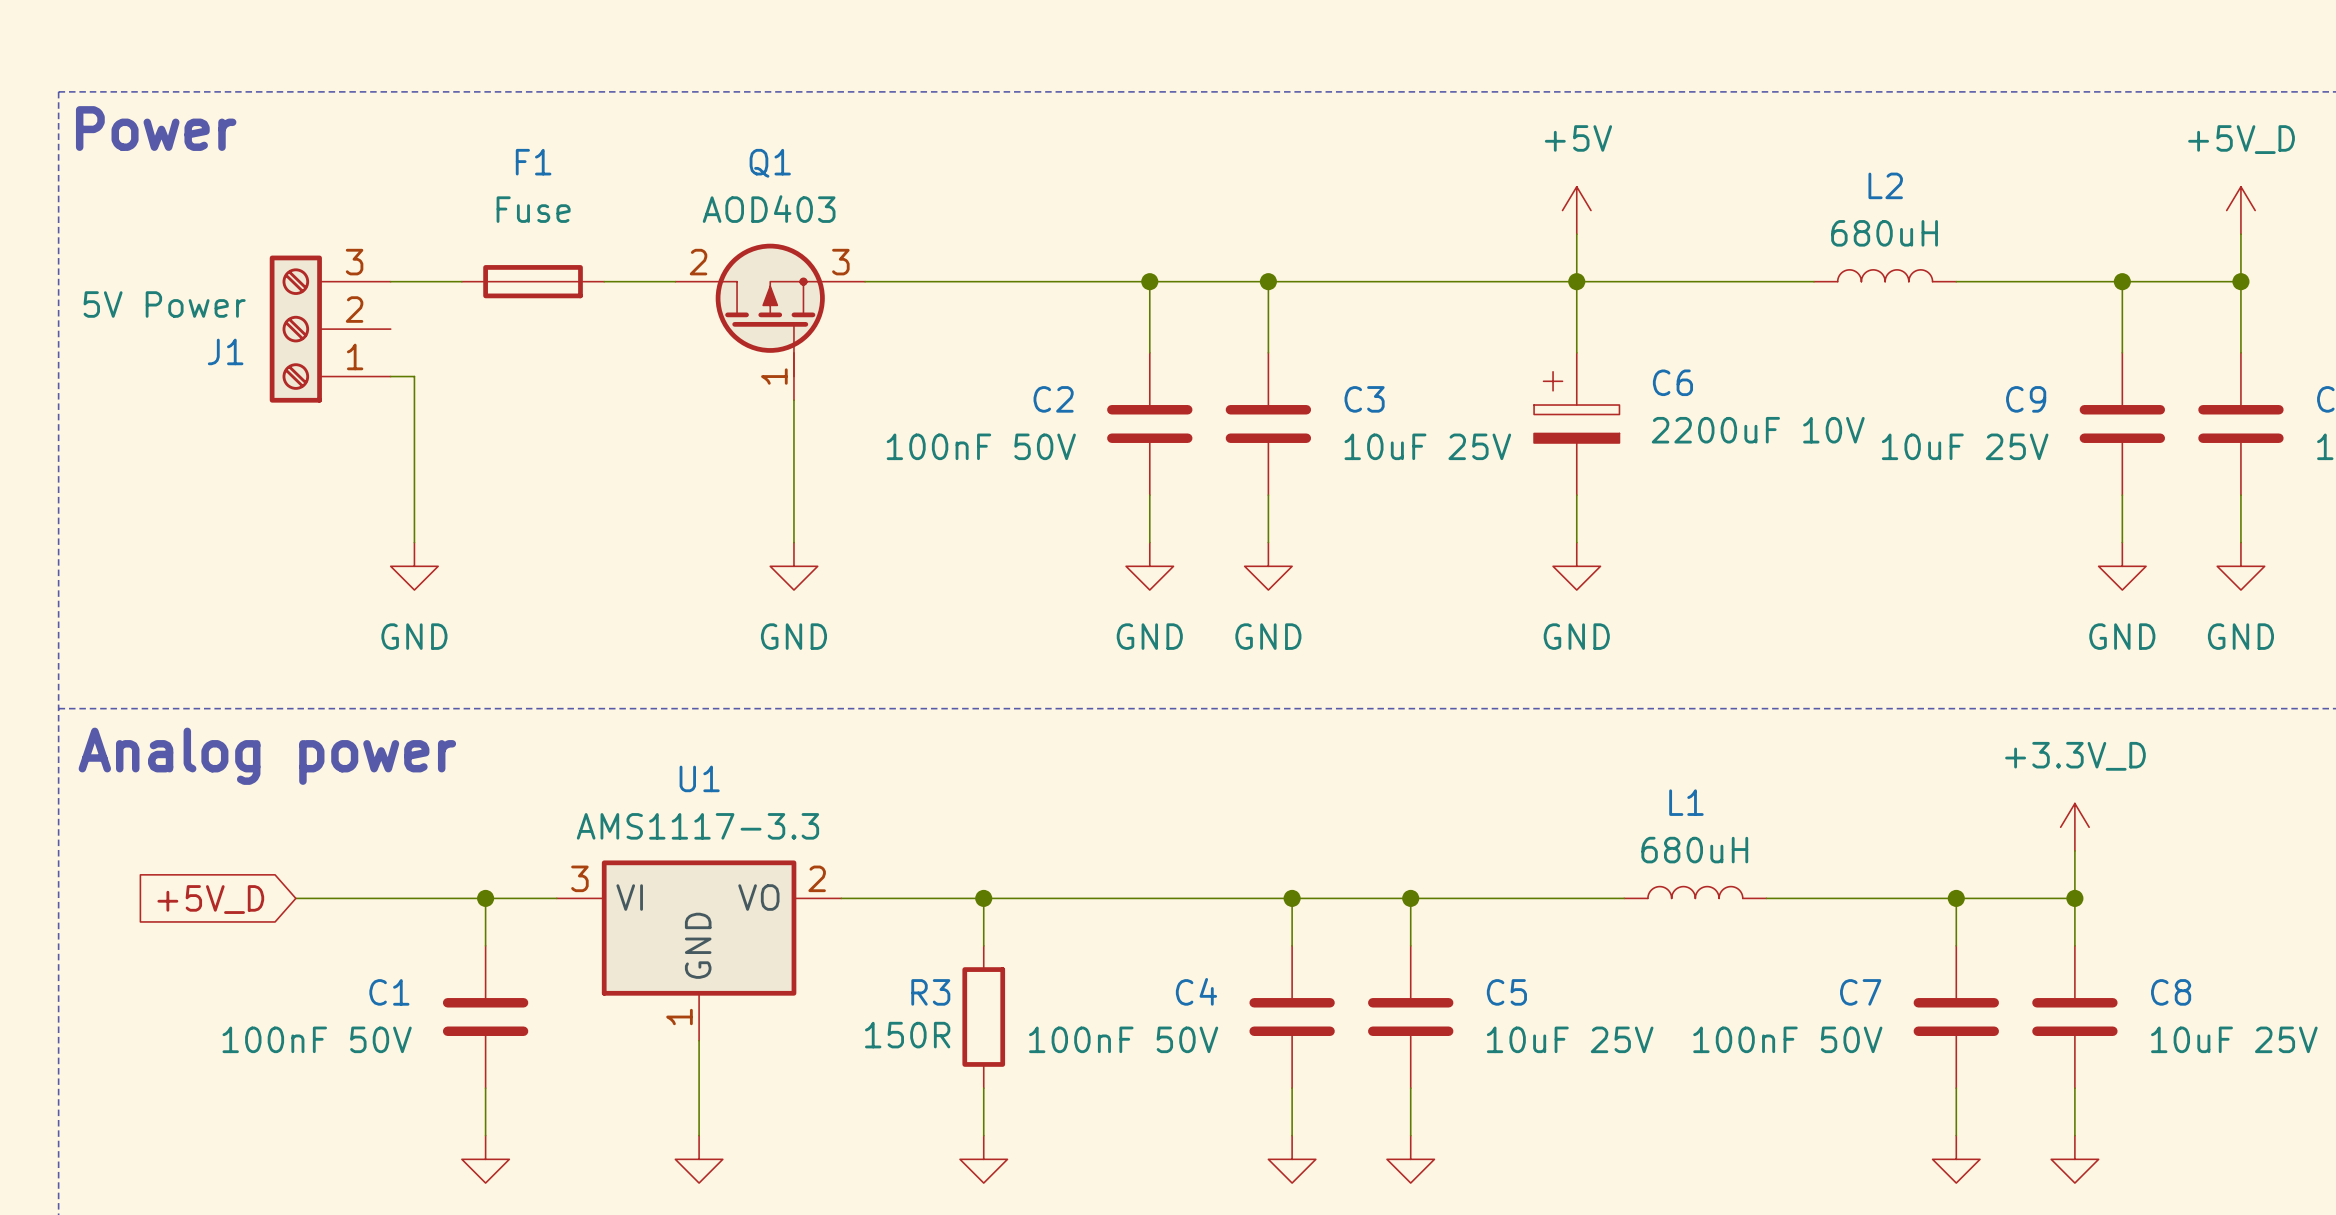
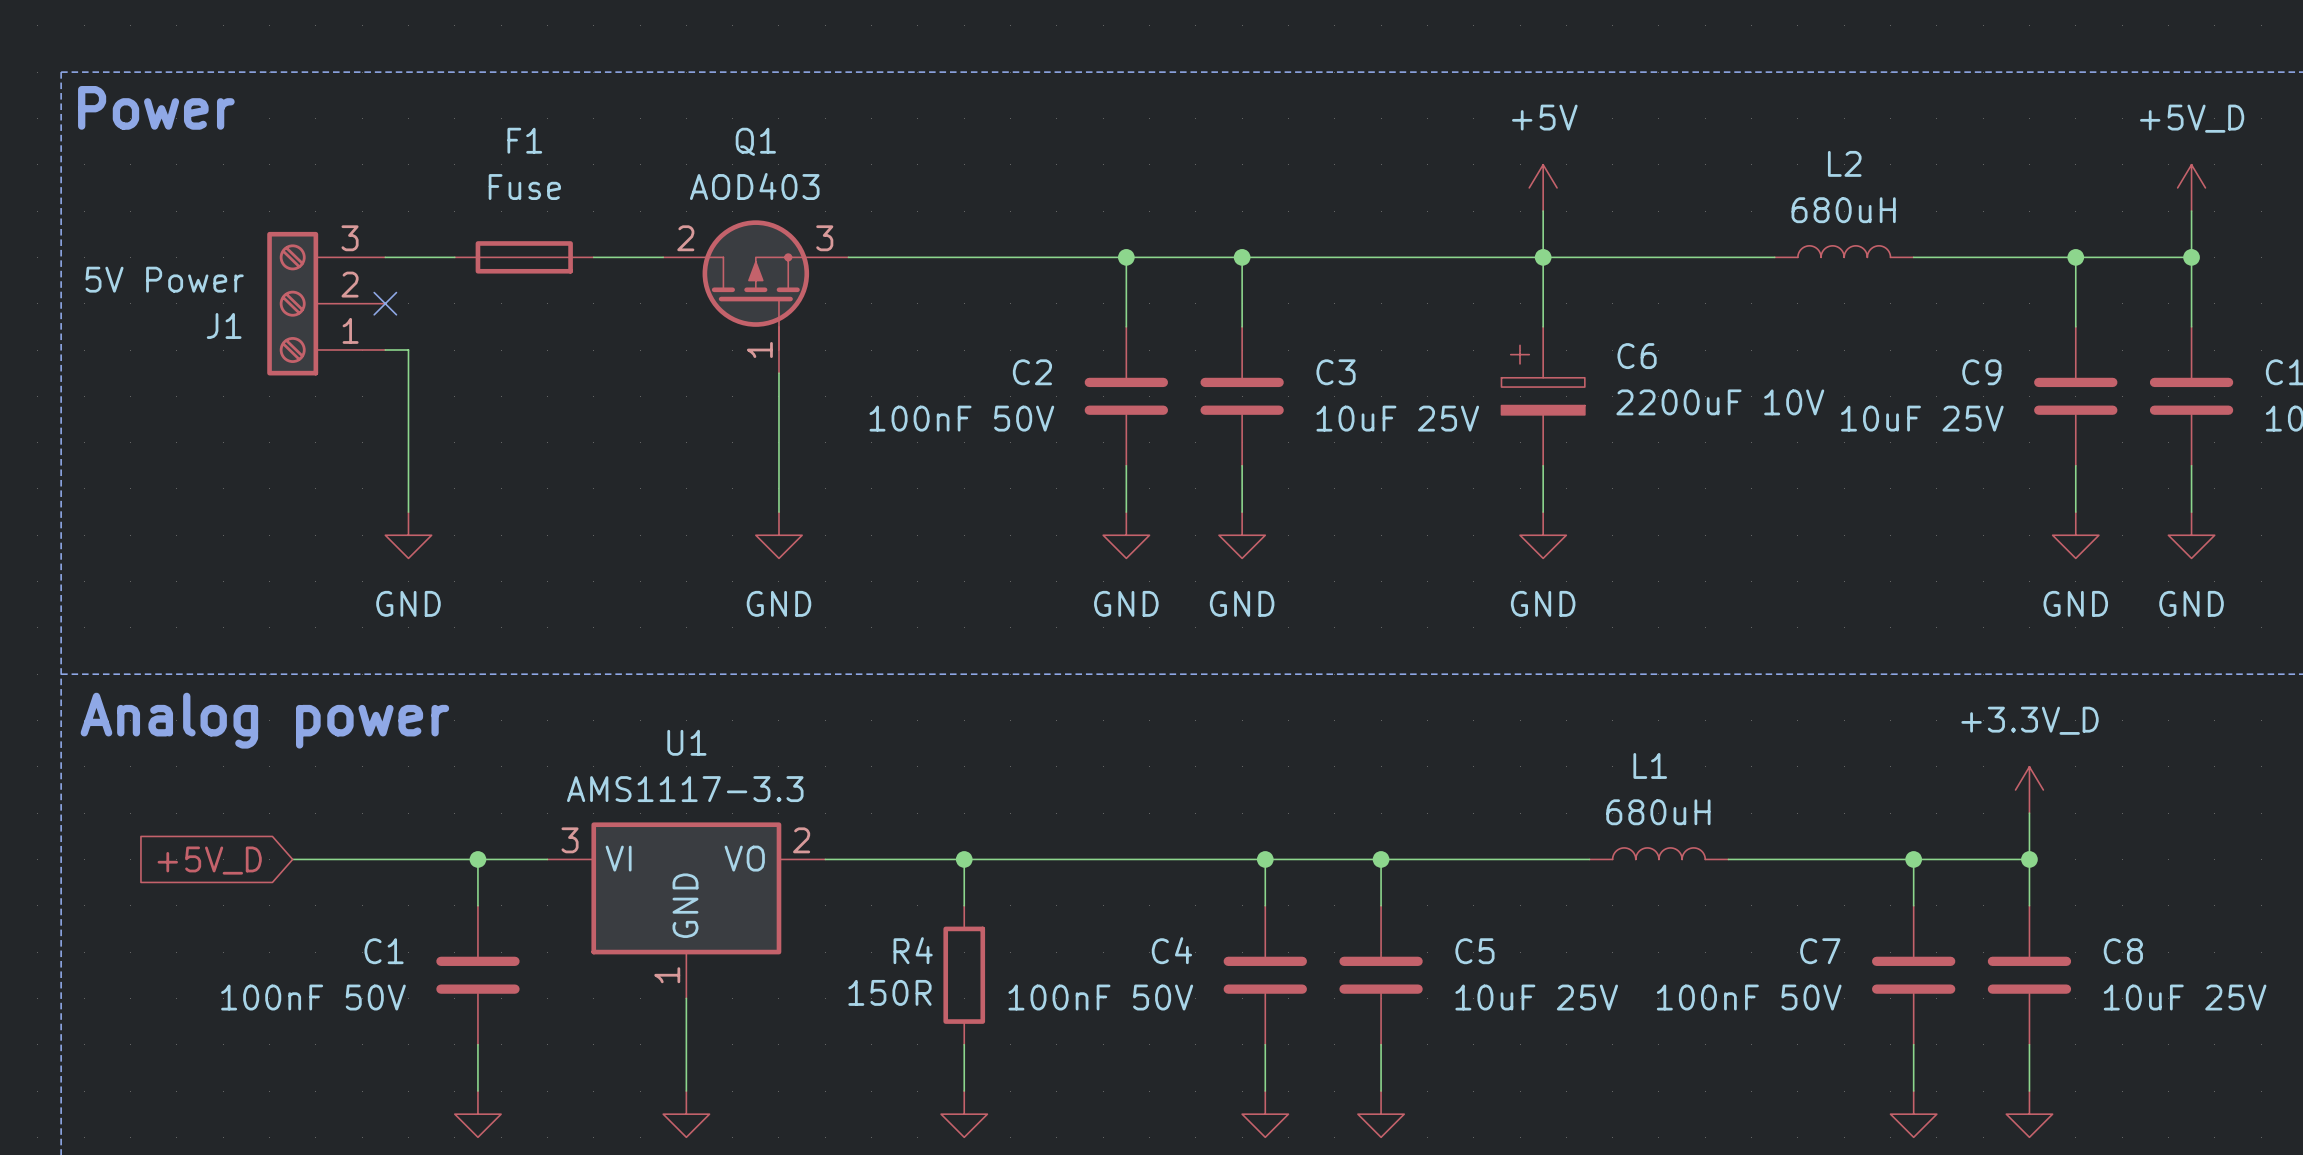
no-connect mark: none -> (385, 303)
R3 name: R3 (930, 992) -> R4 (913, 950)

